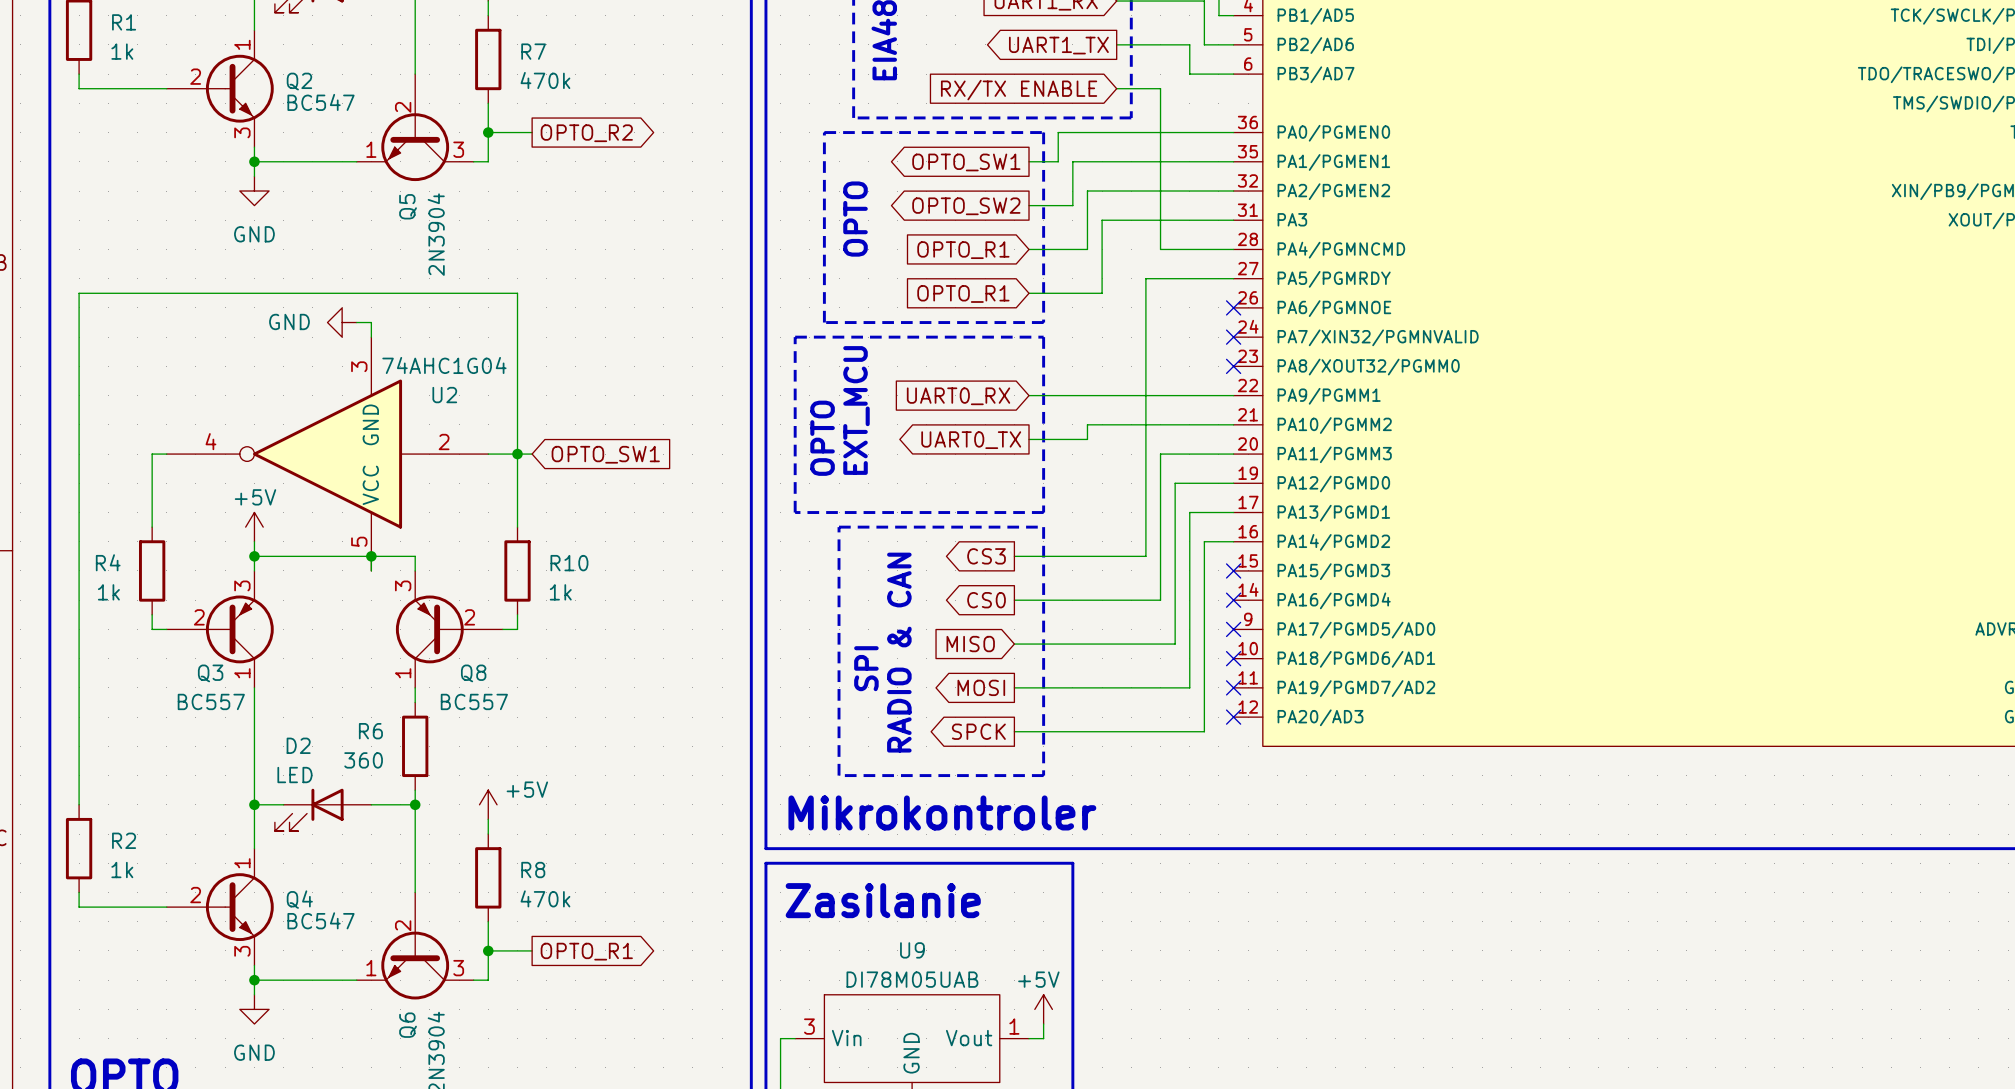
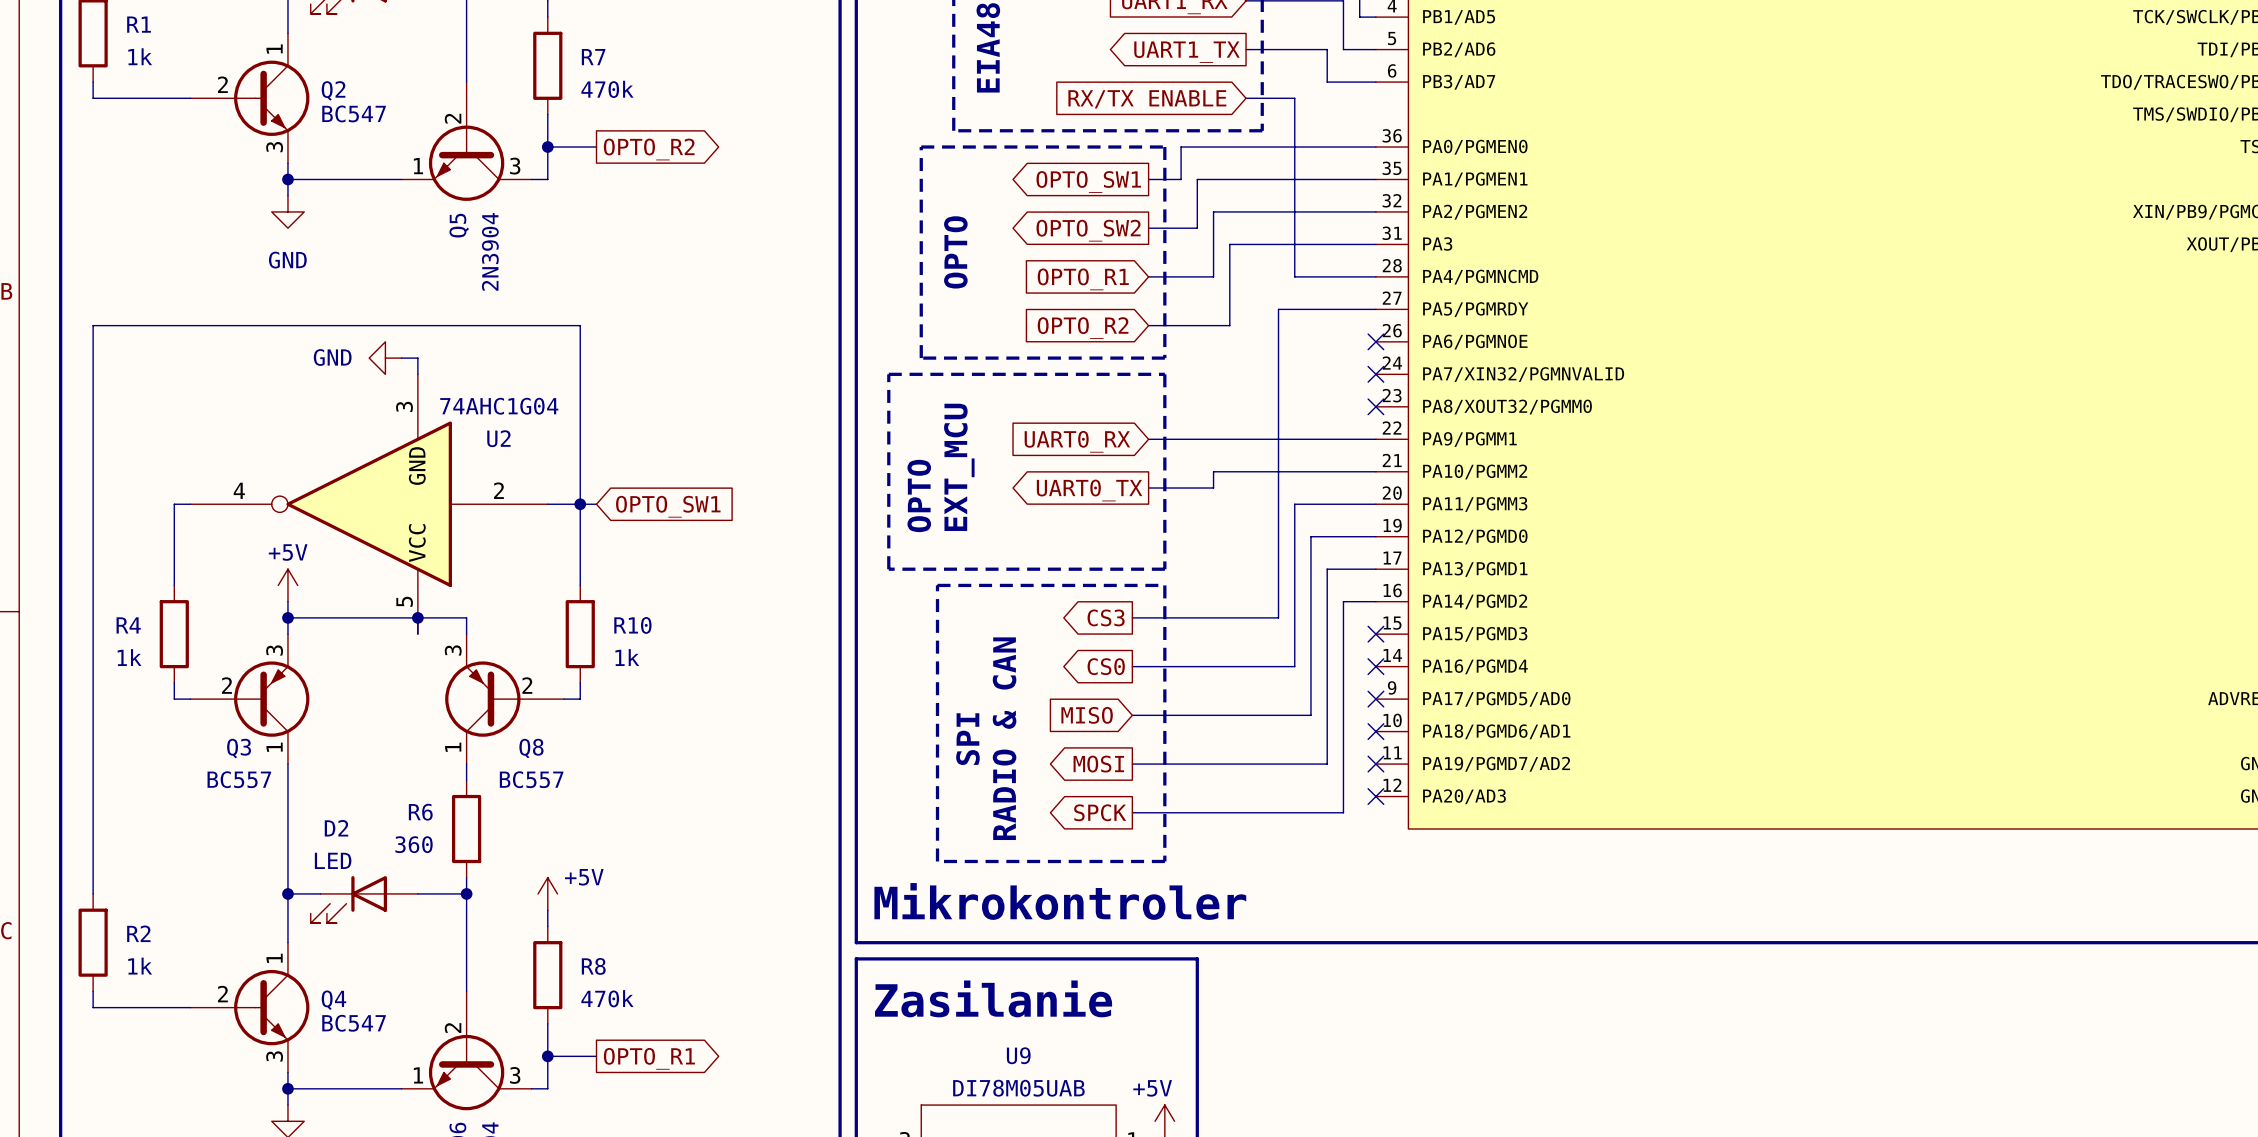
global label: OPTO_R1 (963, 293) -> OPTO_R2 (1083, 328)

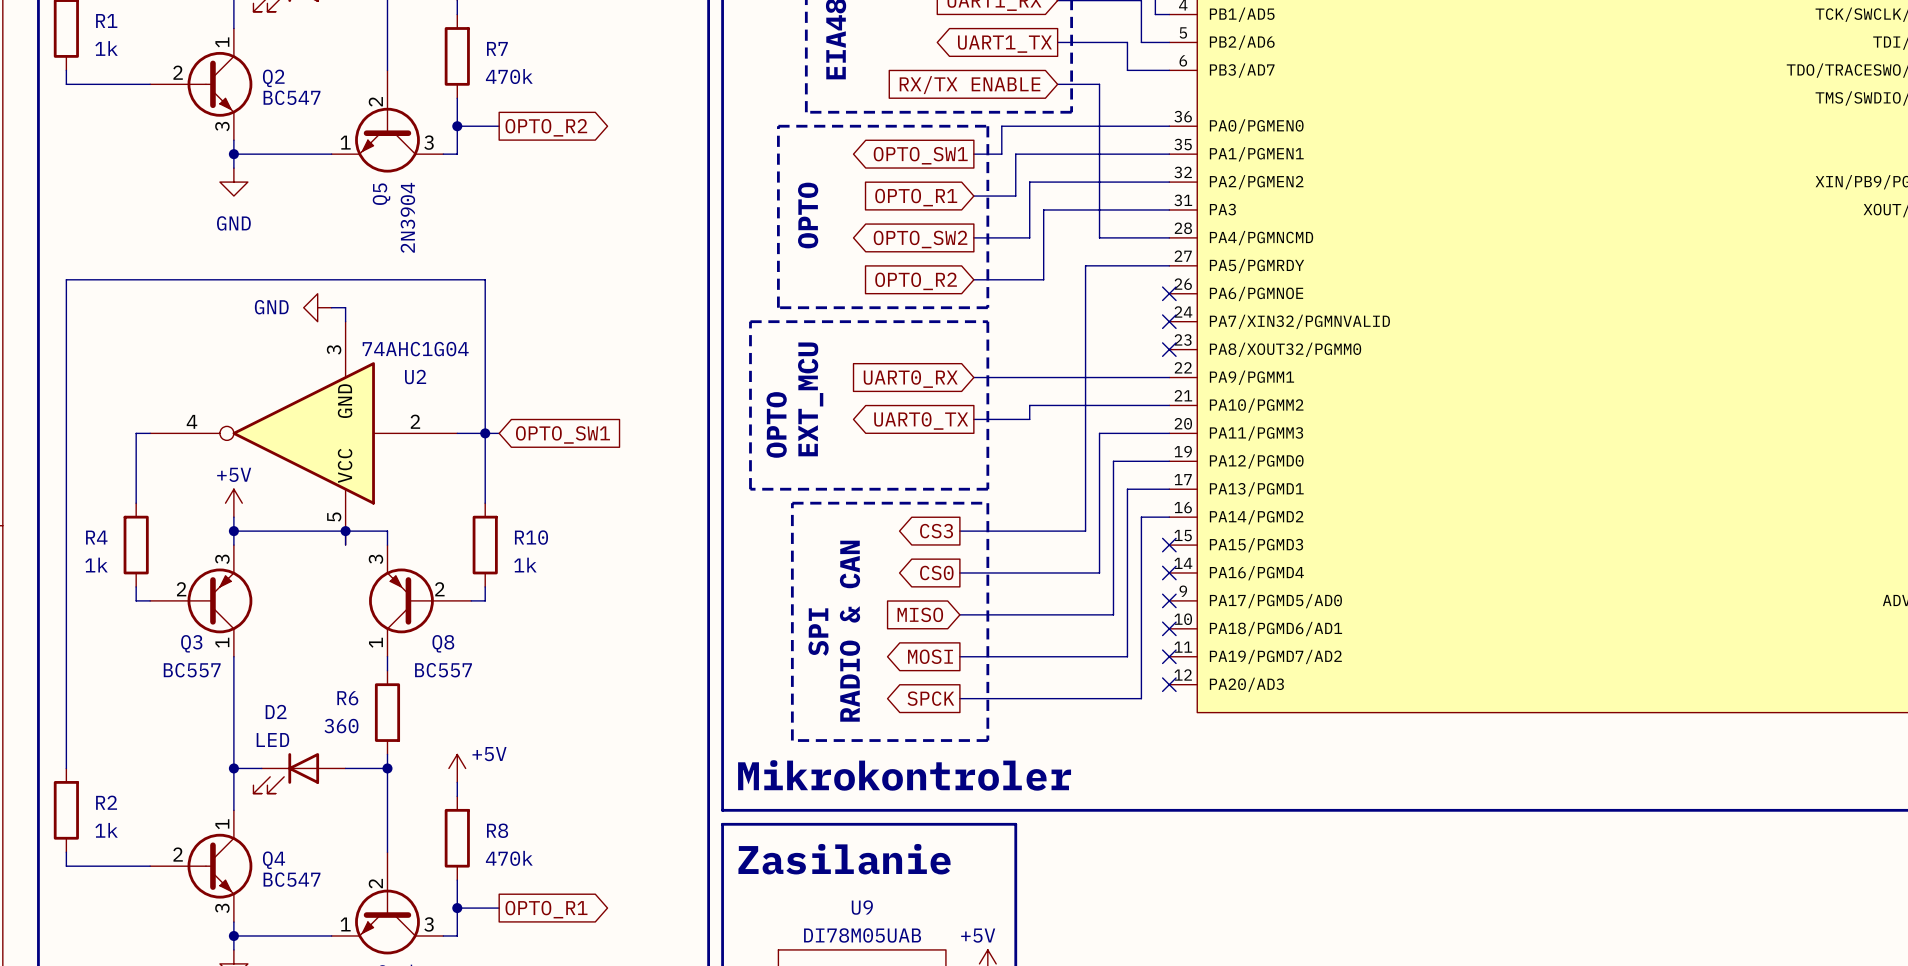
global label shape: output (1088, 230) -> input (916, 197)
global label: OPTO_SW2 (1088, 230) -> OPTO_R1 (916, 197)
global label shape: input (1083, 279) -> output (920, 239)
global label: OPTO_R1 (1083, 279) -> OPTO_SW2 (920, 239)

